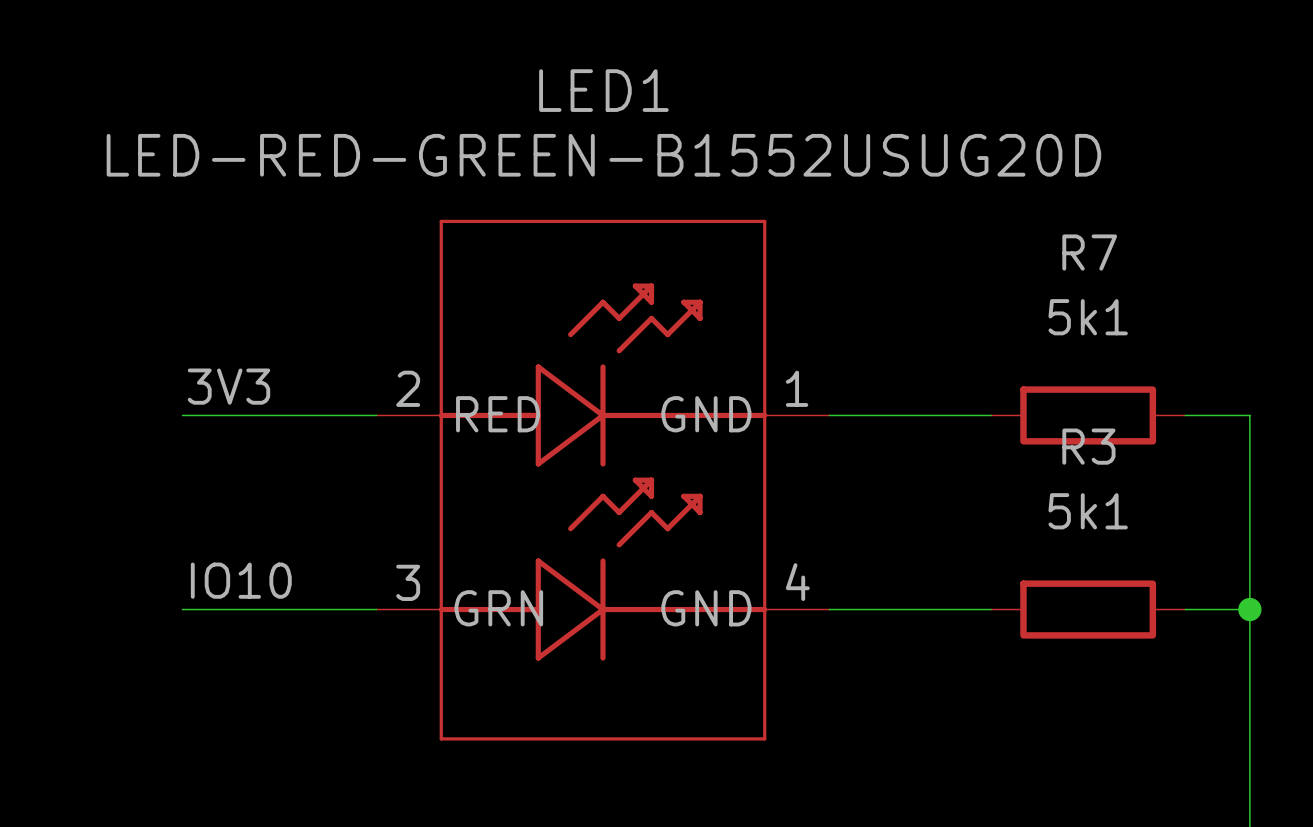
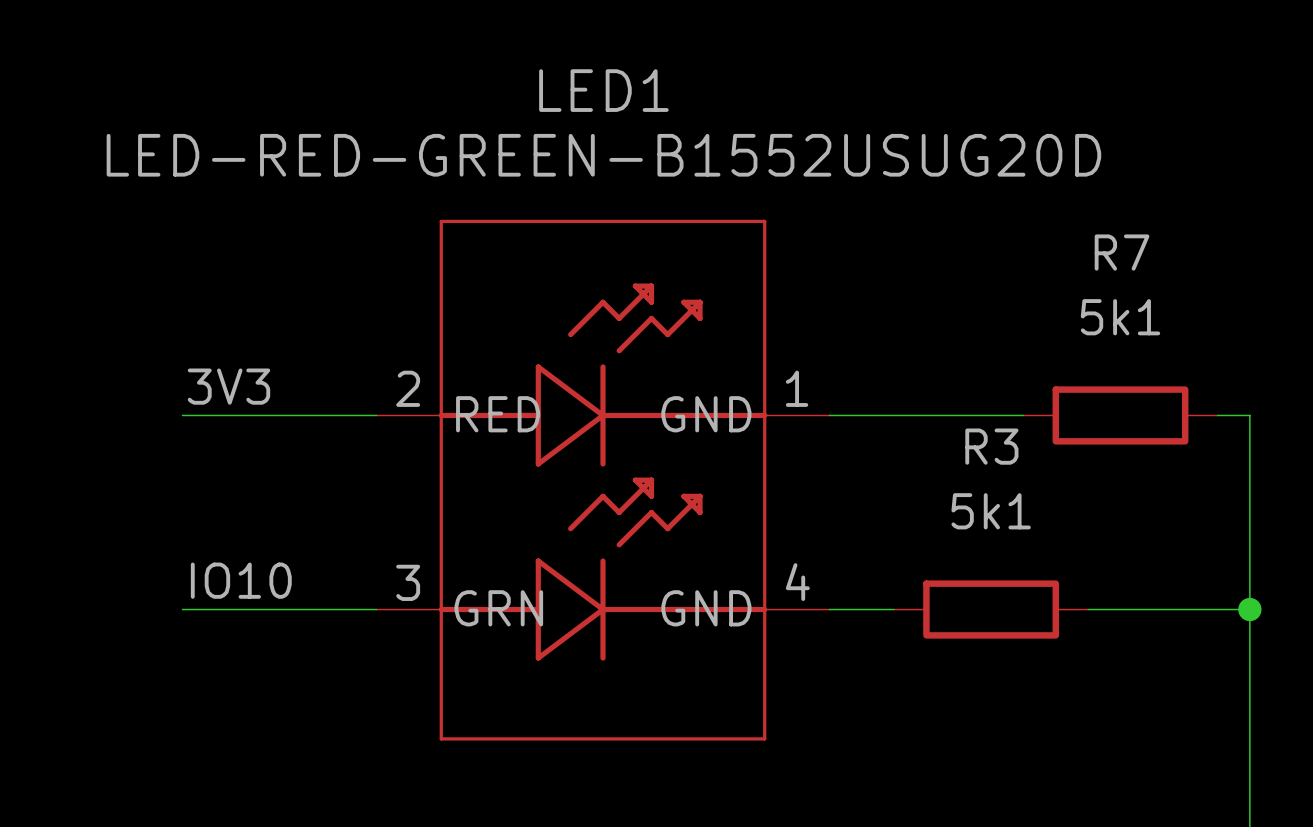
R7 position: (1088, 415) -> (1120, 415)
wire: (894, 609) (991, 609) -> (1088, 609) (1185, 609)
R3 position: (1088, 609) -> (991, 609)

